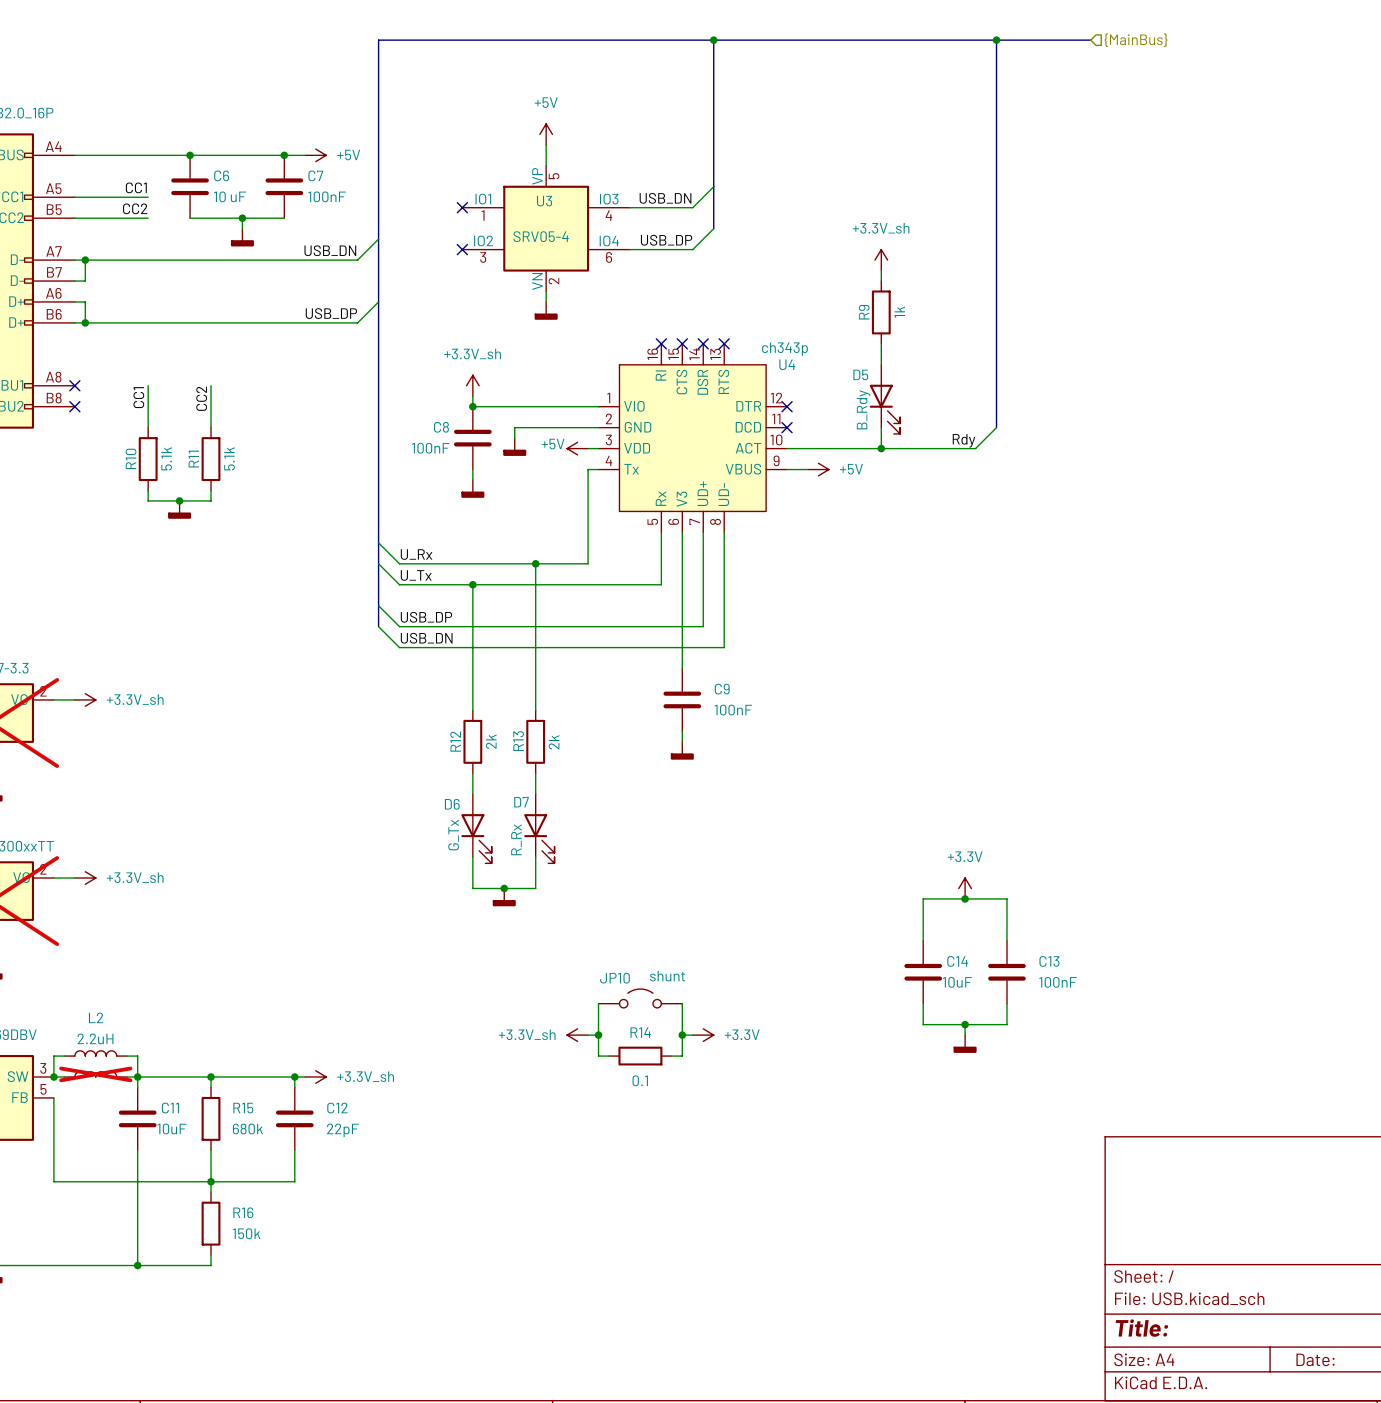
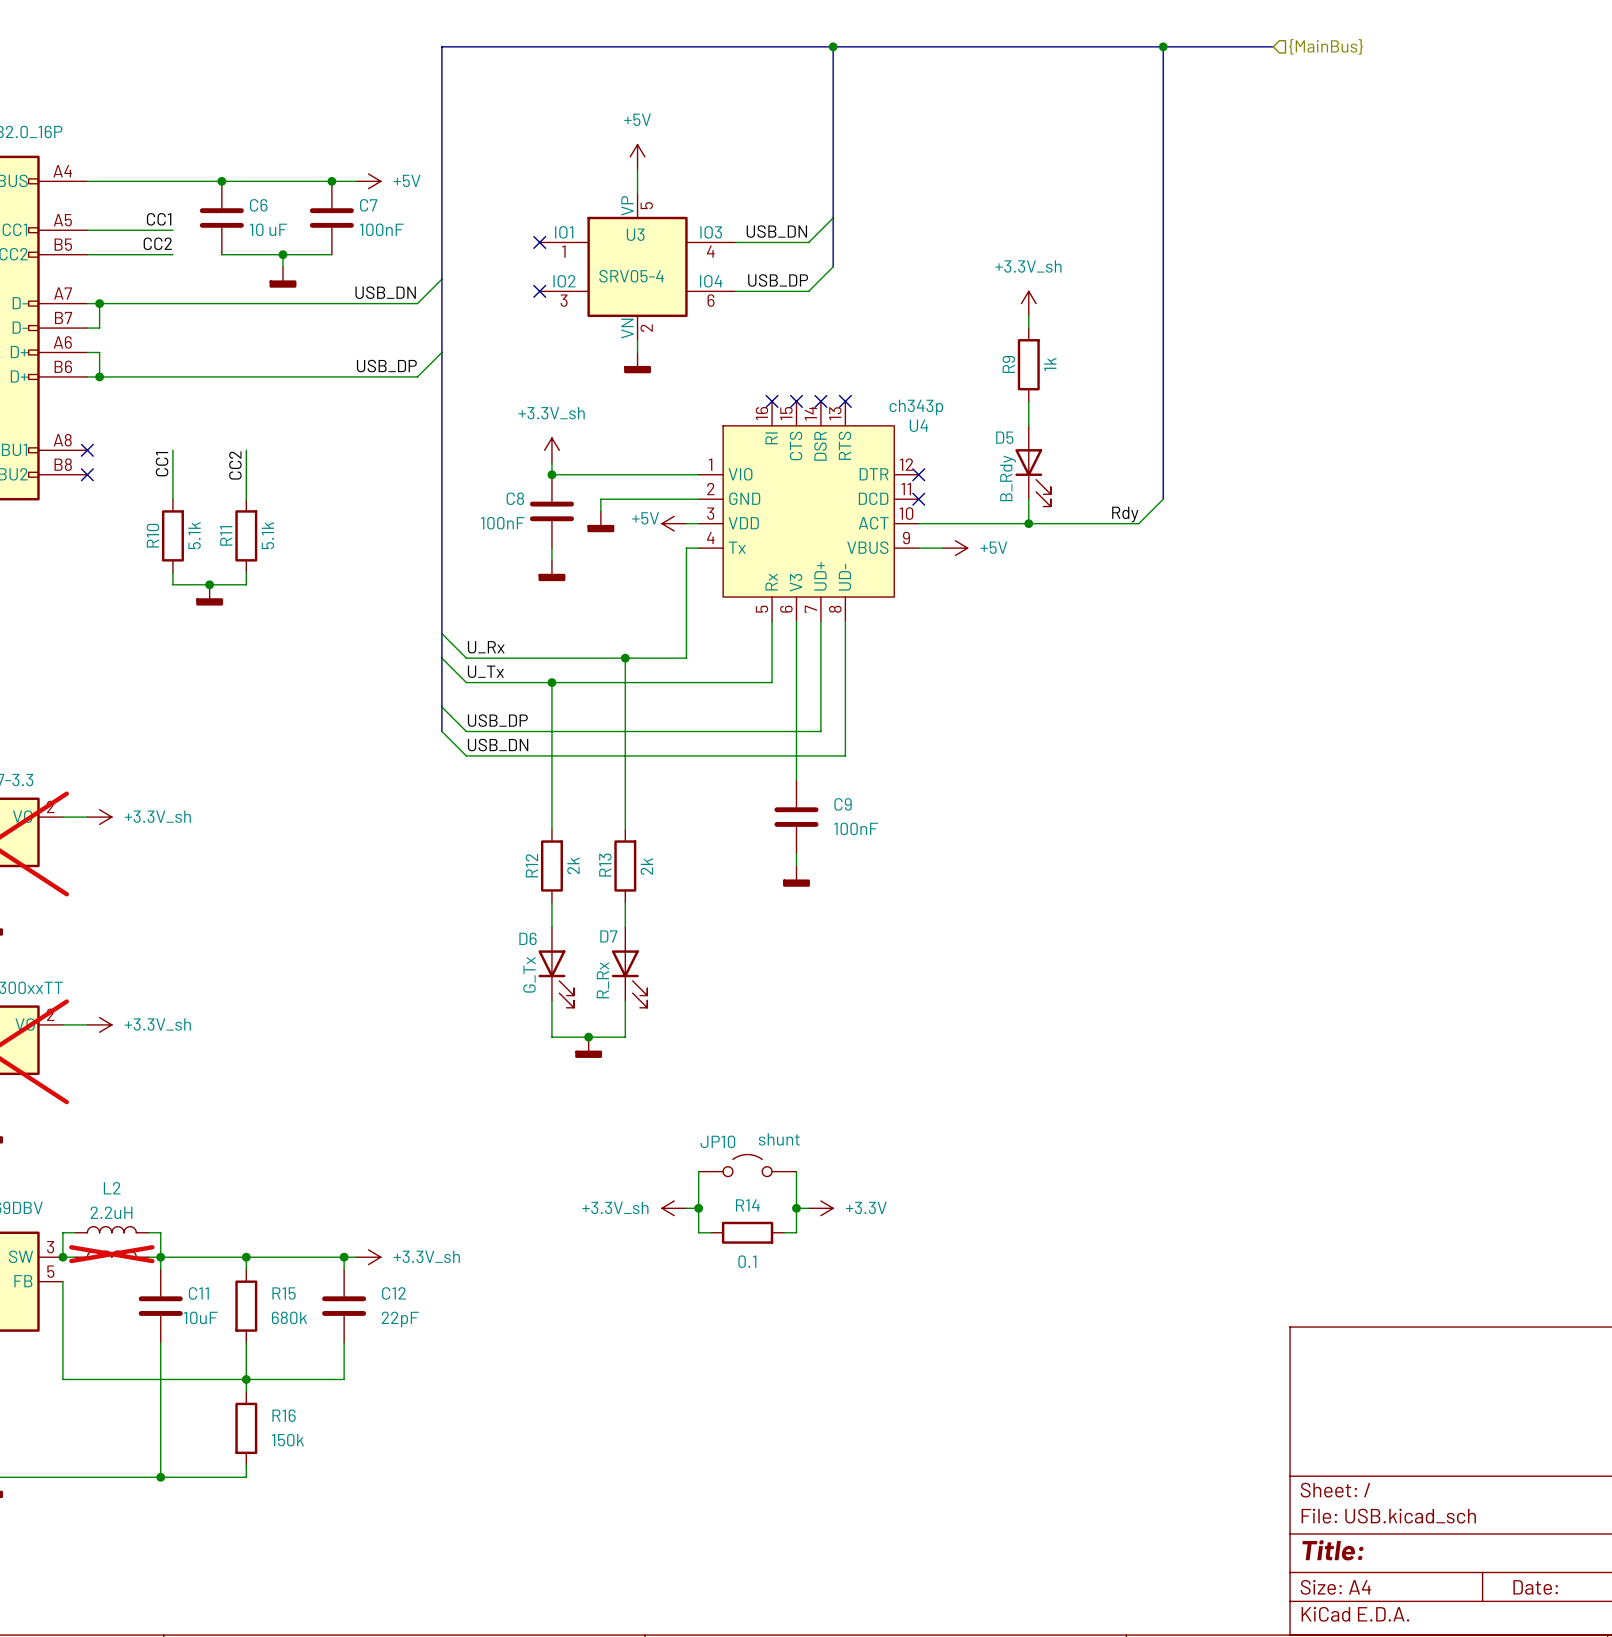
power symbol: +3.3V (965, 888) -> none
junction: (965, 898) -> none
wire: (923, 940) (923, 898) (1006, 898) (1006, 940) -> none
C14: 10uF (923, 972) -> none
C13: 100nF (1006, 972) -> none
wire: (923, 1003) (923, 1024) (1006, 1024) (1006, 1003) -> none
wire: (965, 1024) (965, 1035) -> none
junction: (965, 1024) -> none
power symbol: (965, 1044) -> none

